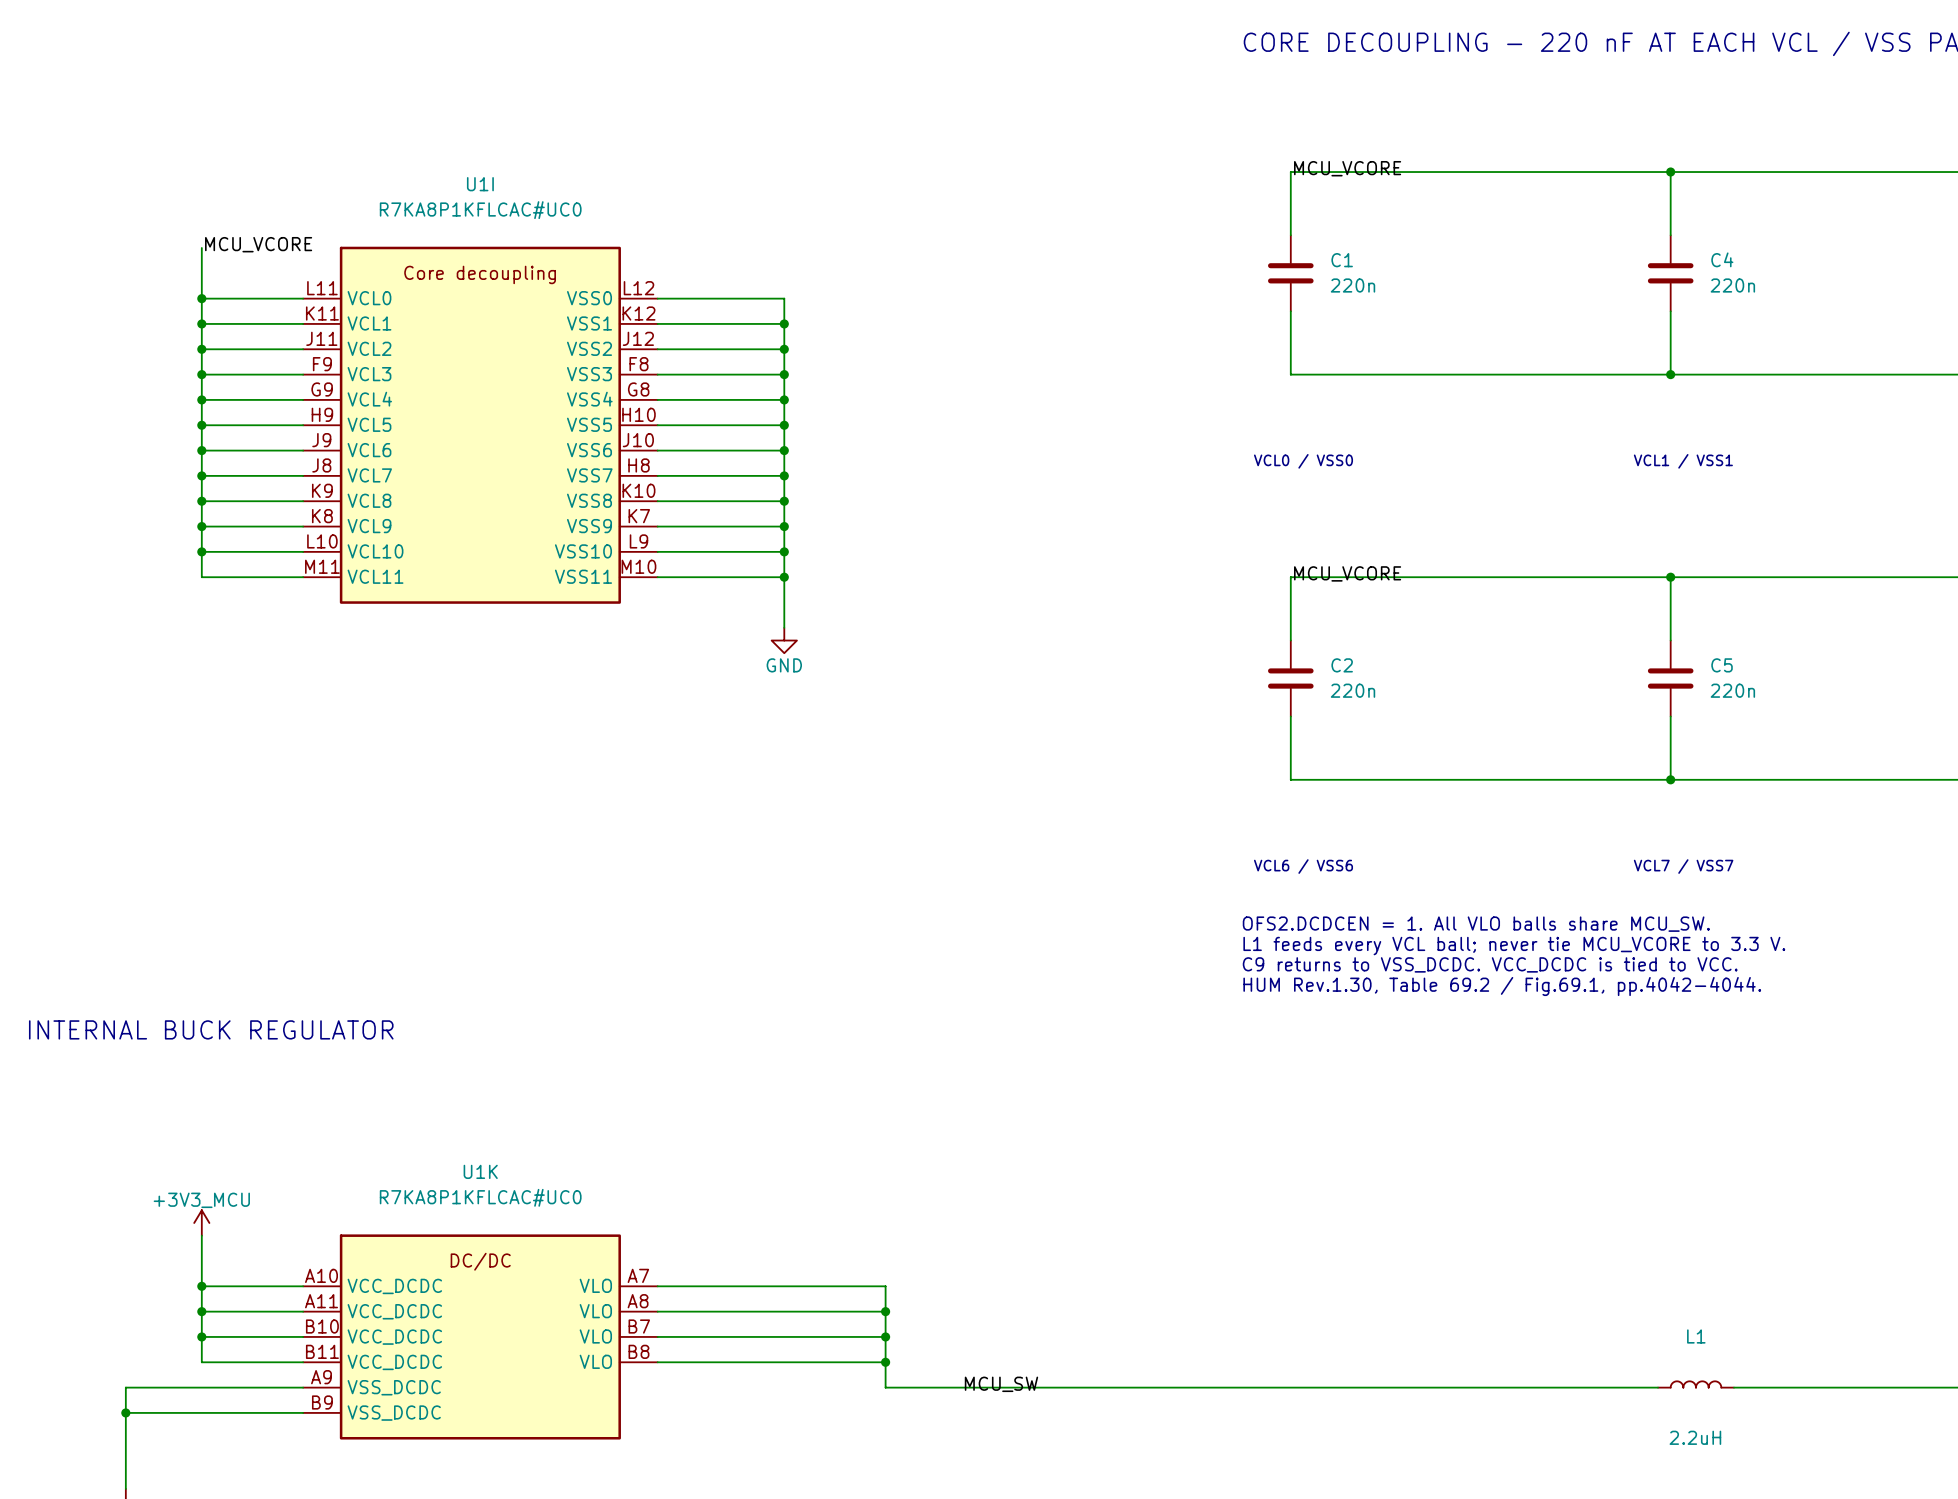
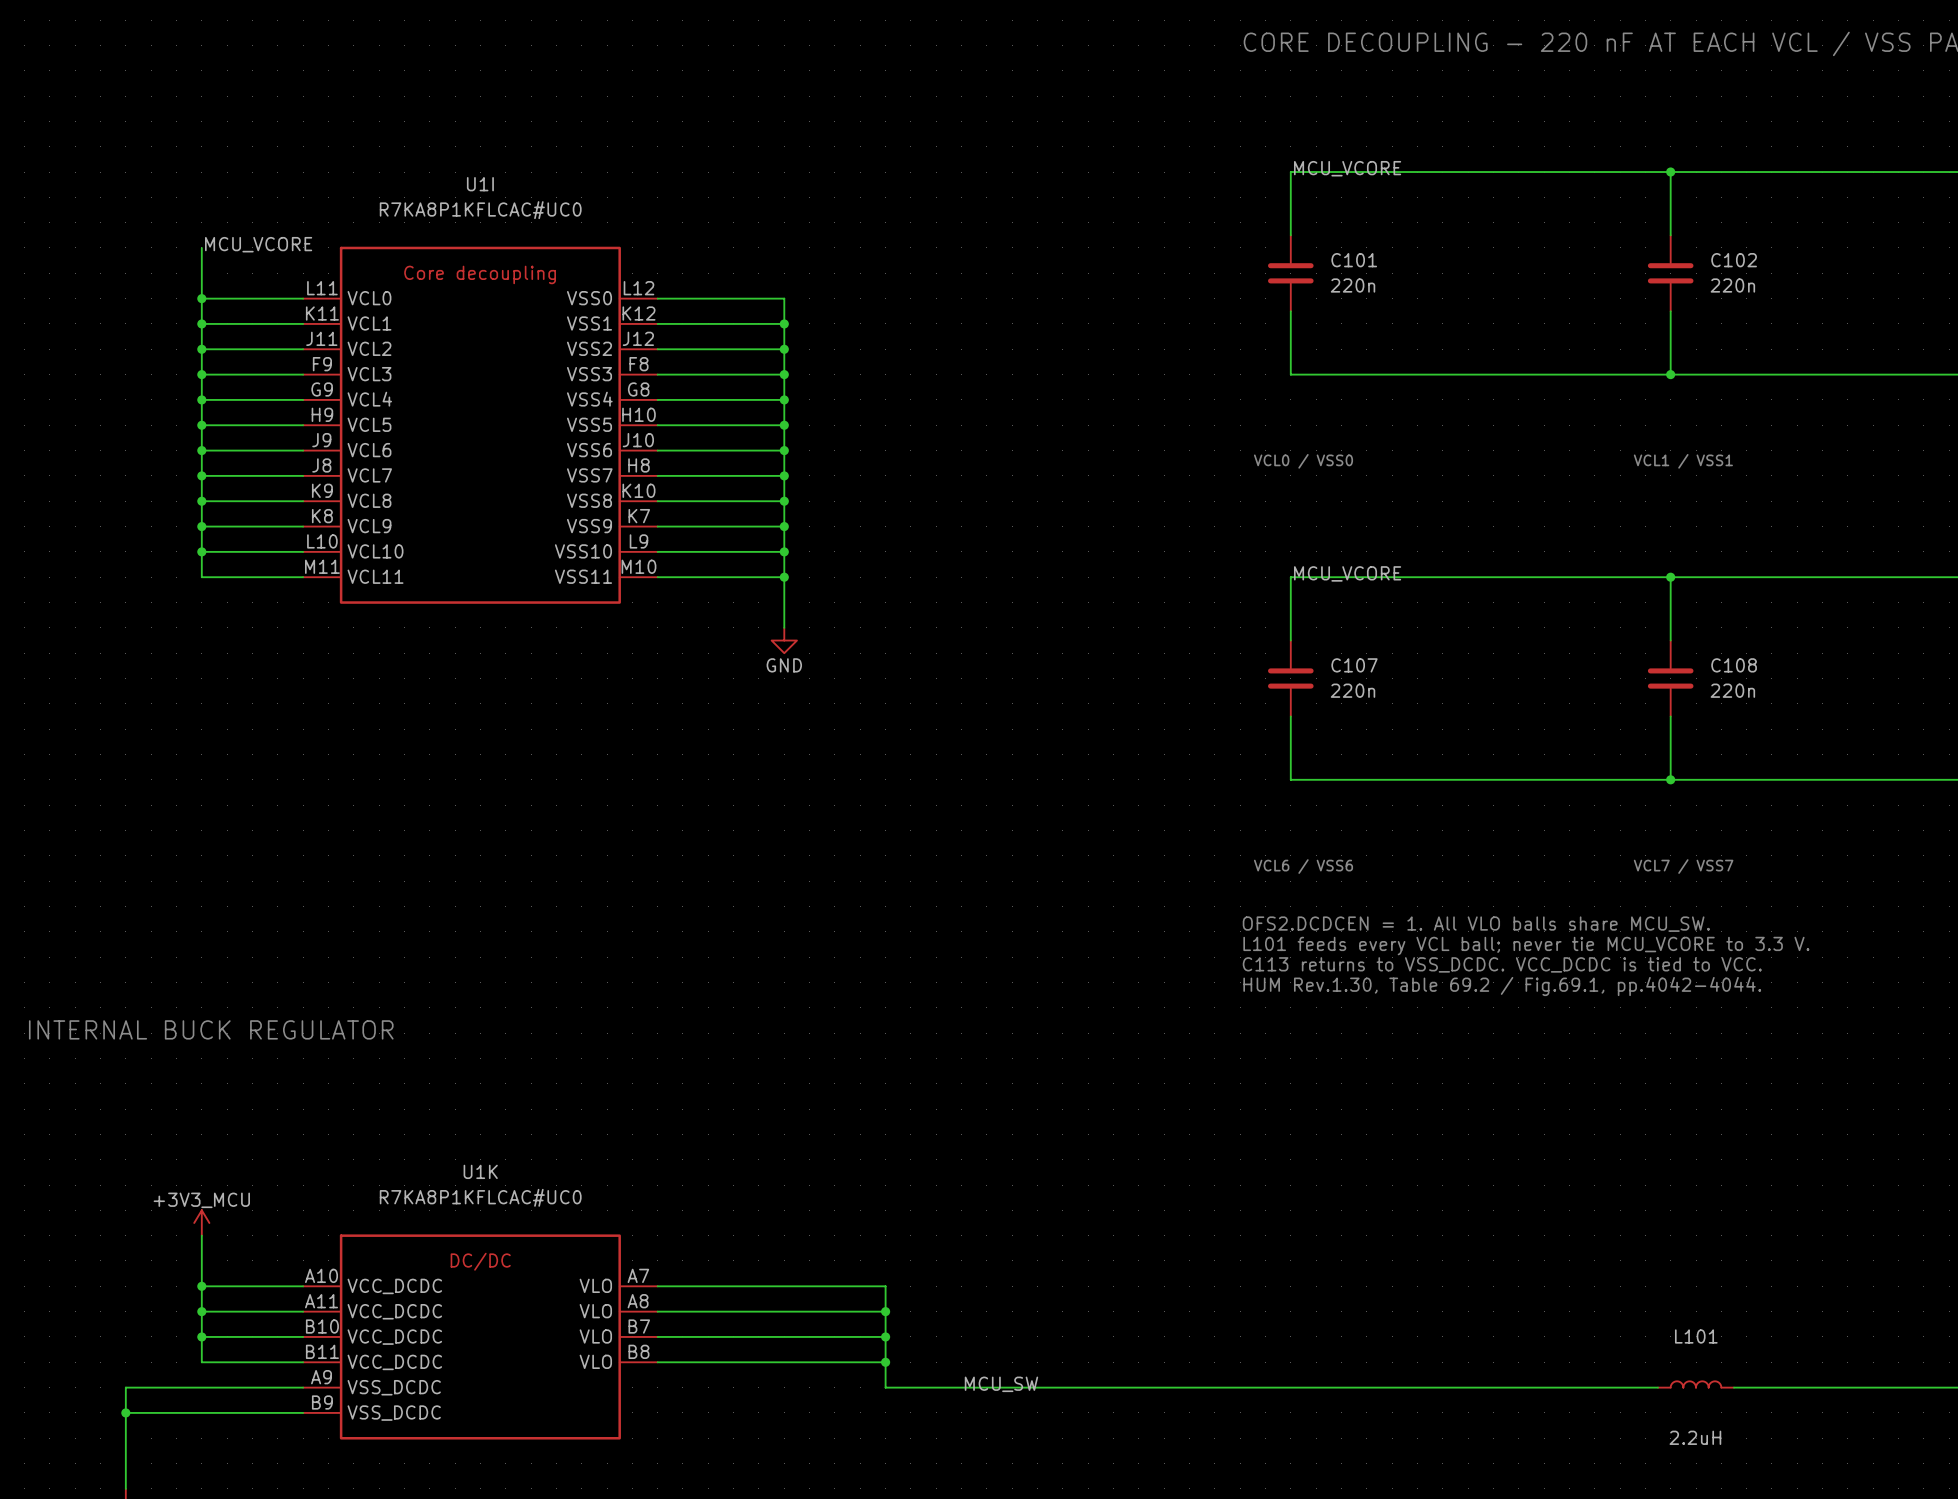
C4 name: C4 (1722, 259) -> C102 (1734, 260)
C1 name: C1 (1342, 260) -> C101 (1354, 260)
C2 name: C2 (1342, 665) -> C107 (1354, 665)
C5 name: C5 (1722, 665) -> C108 (1734, 665)
text: L1 feeds every VCL ball; never tie MCU_VCORE to 3.3 V. (1514, 946) -> L101 feeds every VCL ball; never tie MCU_VCORE to 3.3 V. (1526, 946)
text: C9 returns to VSS_DCDC. VCC_DCDC is tied to VCC. (1490, 964) -> C113 returns to VSS_DCDC. VCC_DCDC is tied to VCC. (1502, 964)
L1 name: L1 (1696, 1336) -> L101 (1696, 1336)

